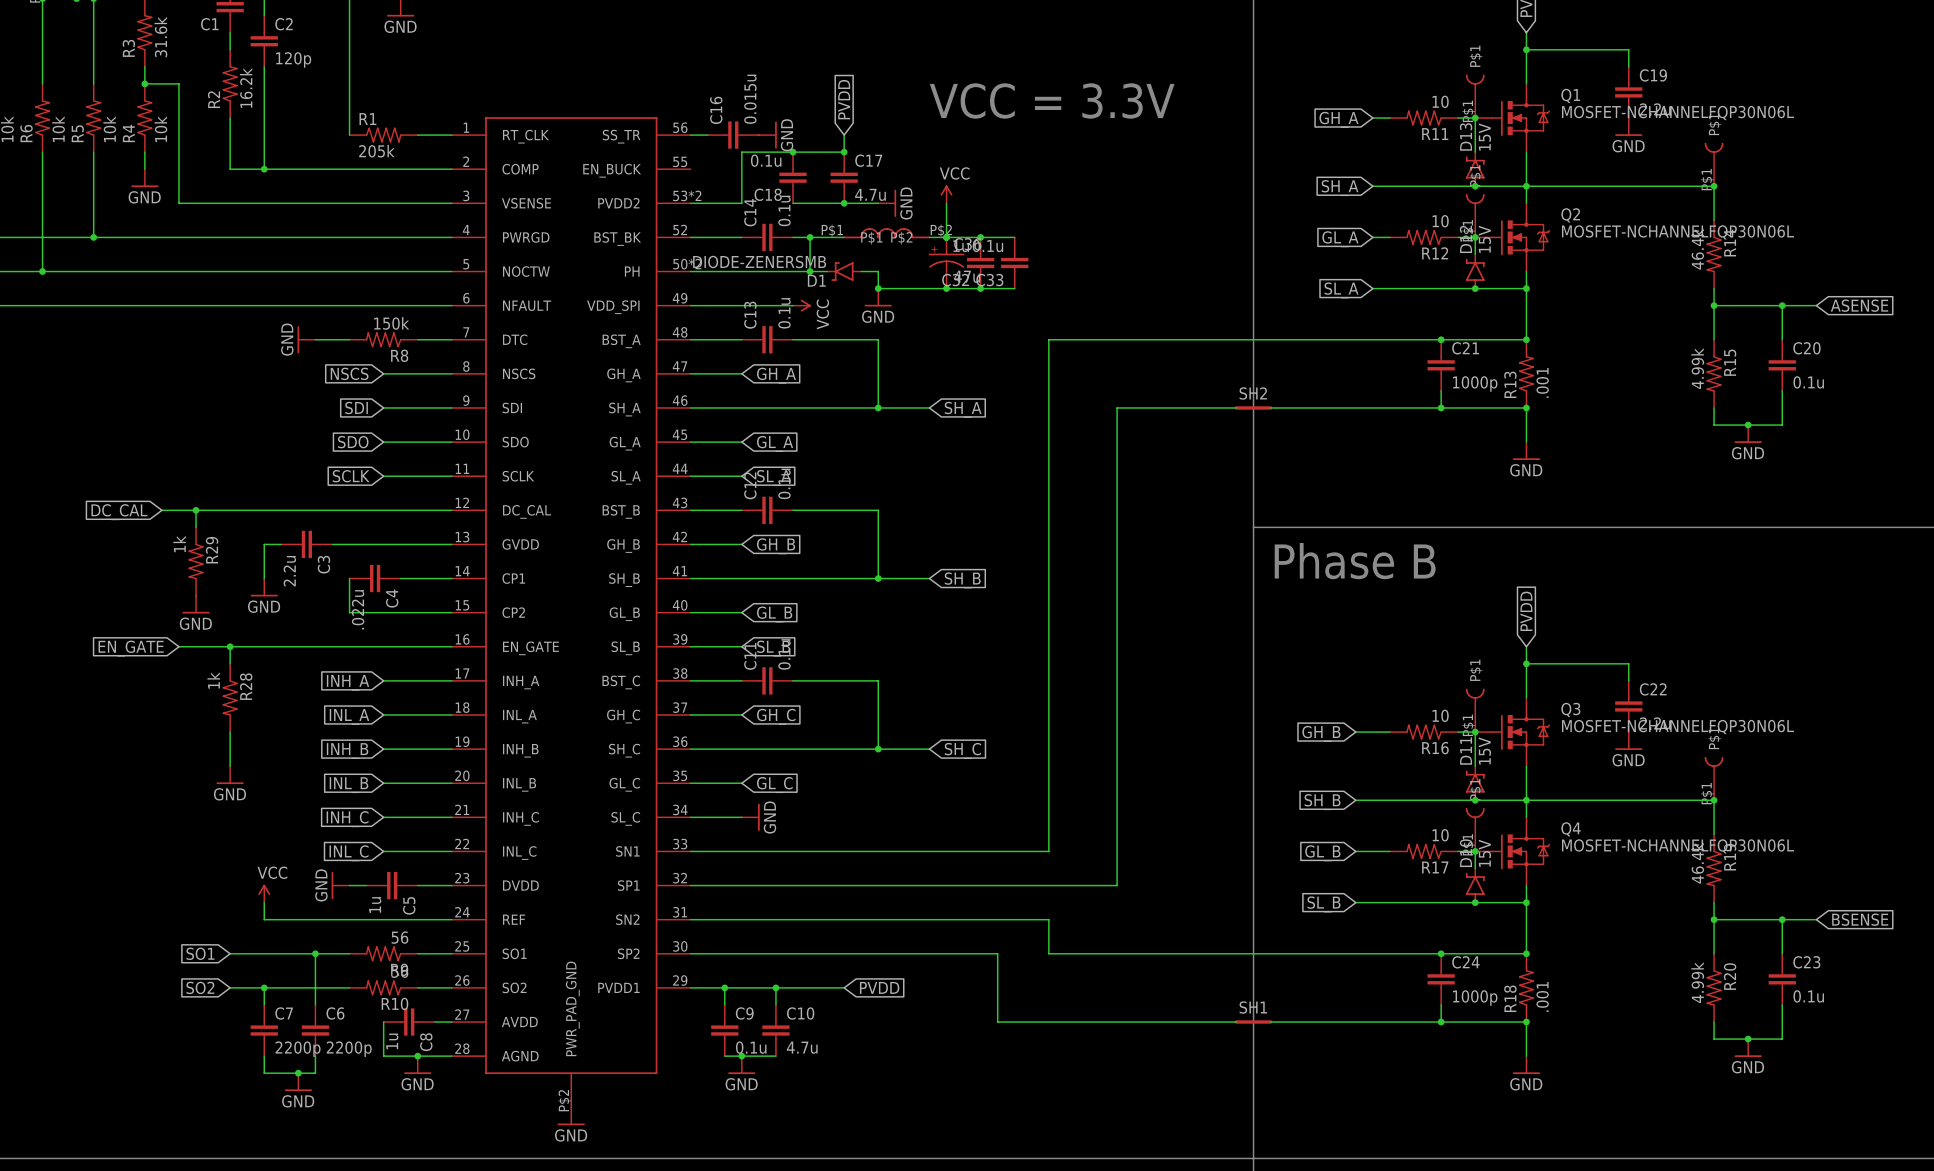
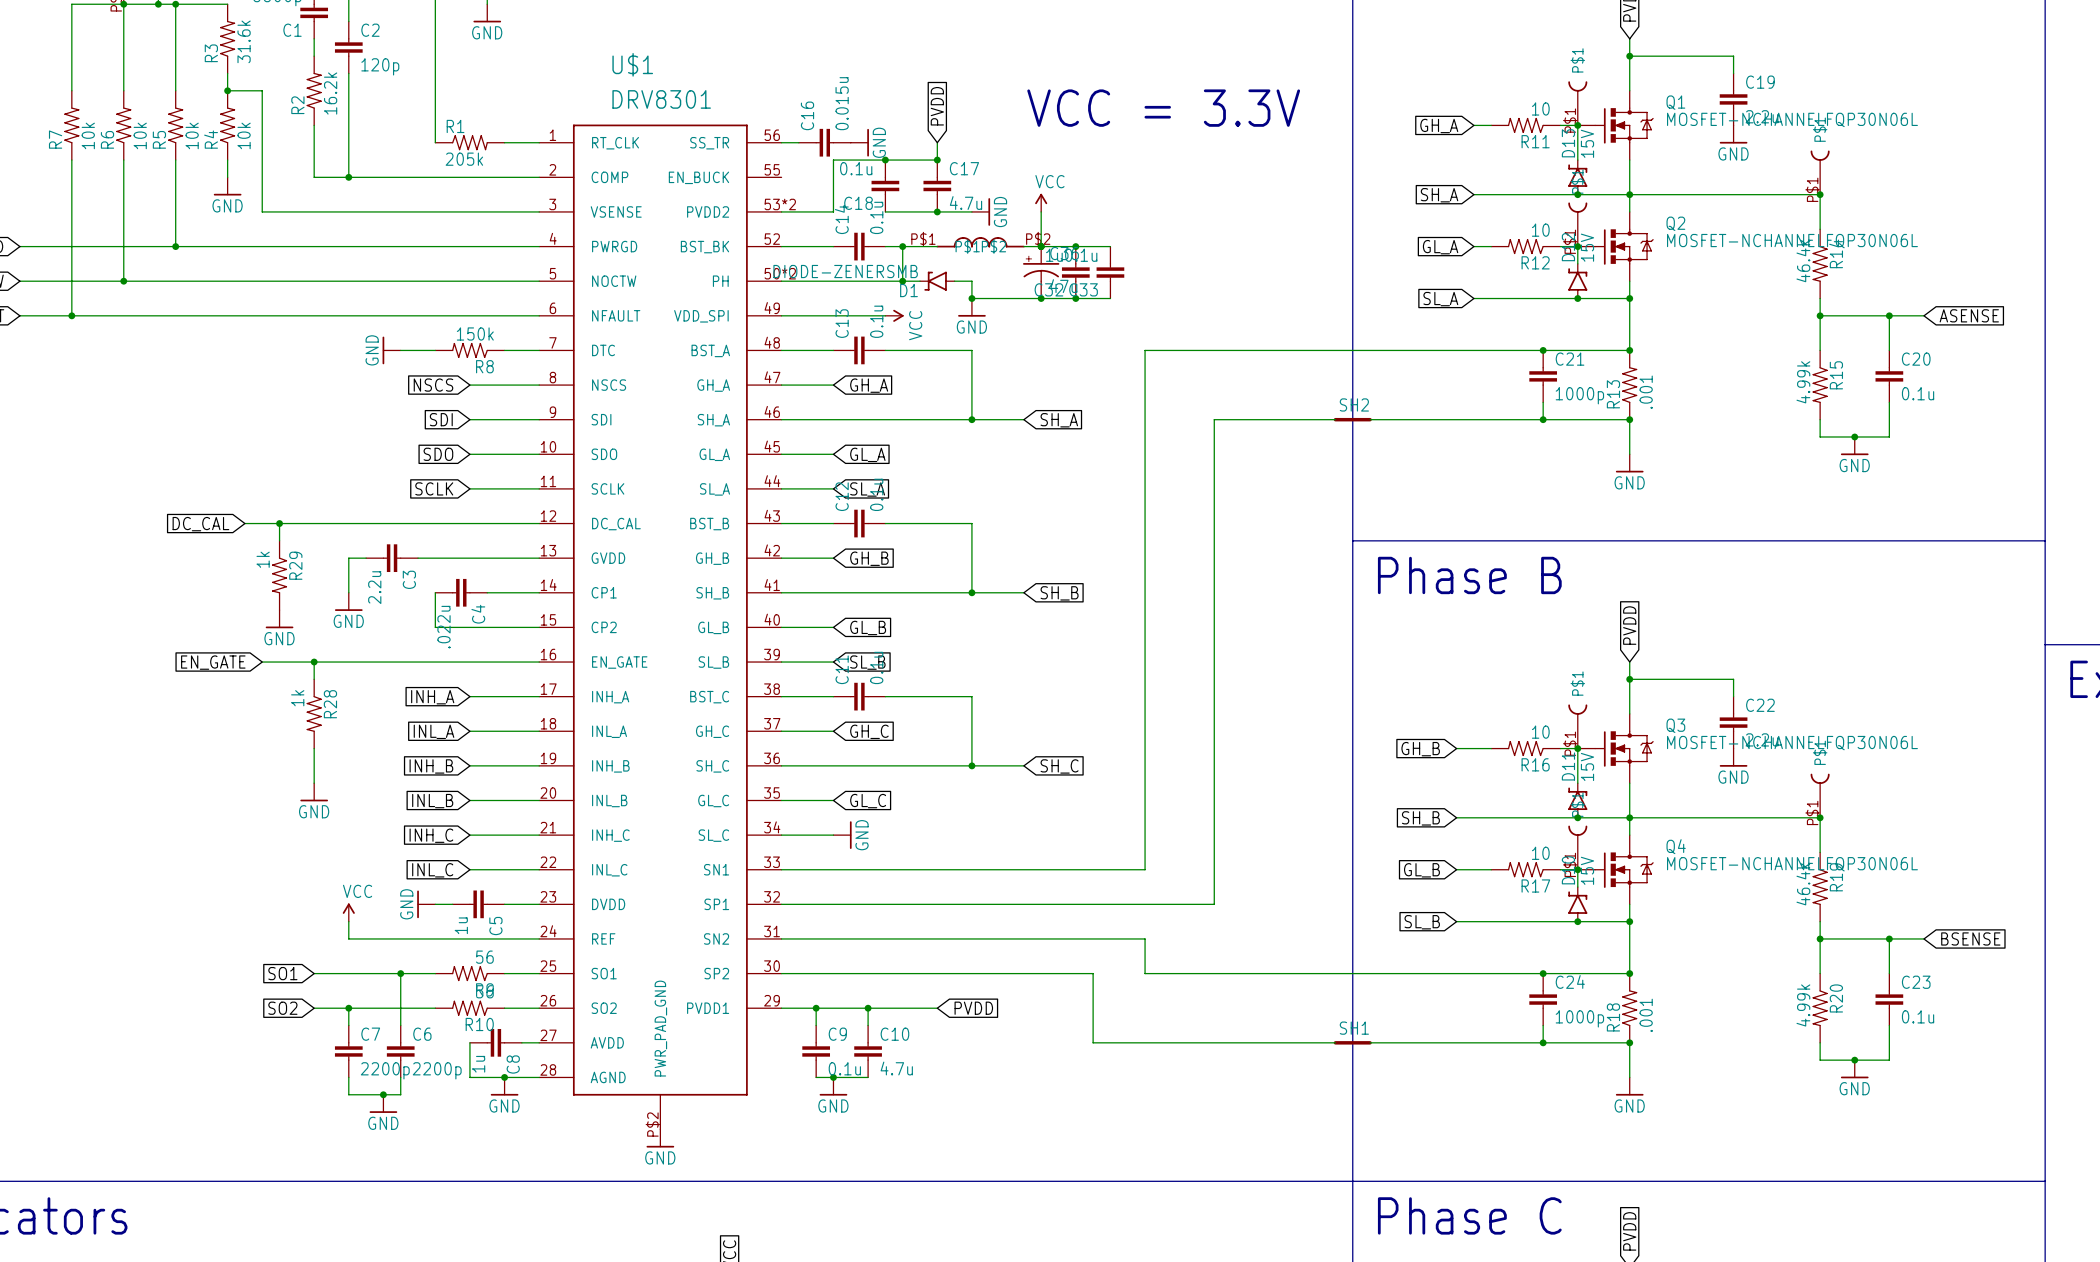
U$1 name: none -> U$1 (632, 64)
U$1 value: none -> DRV8301 (661, 99)

